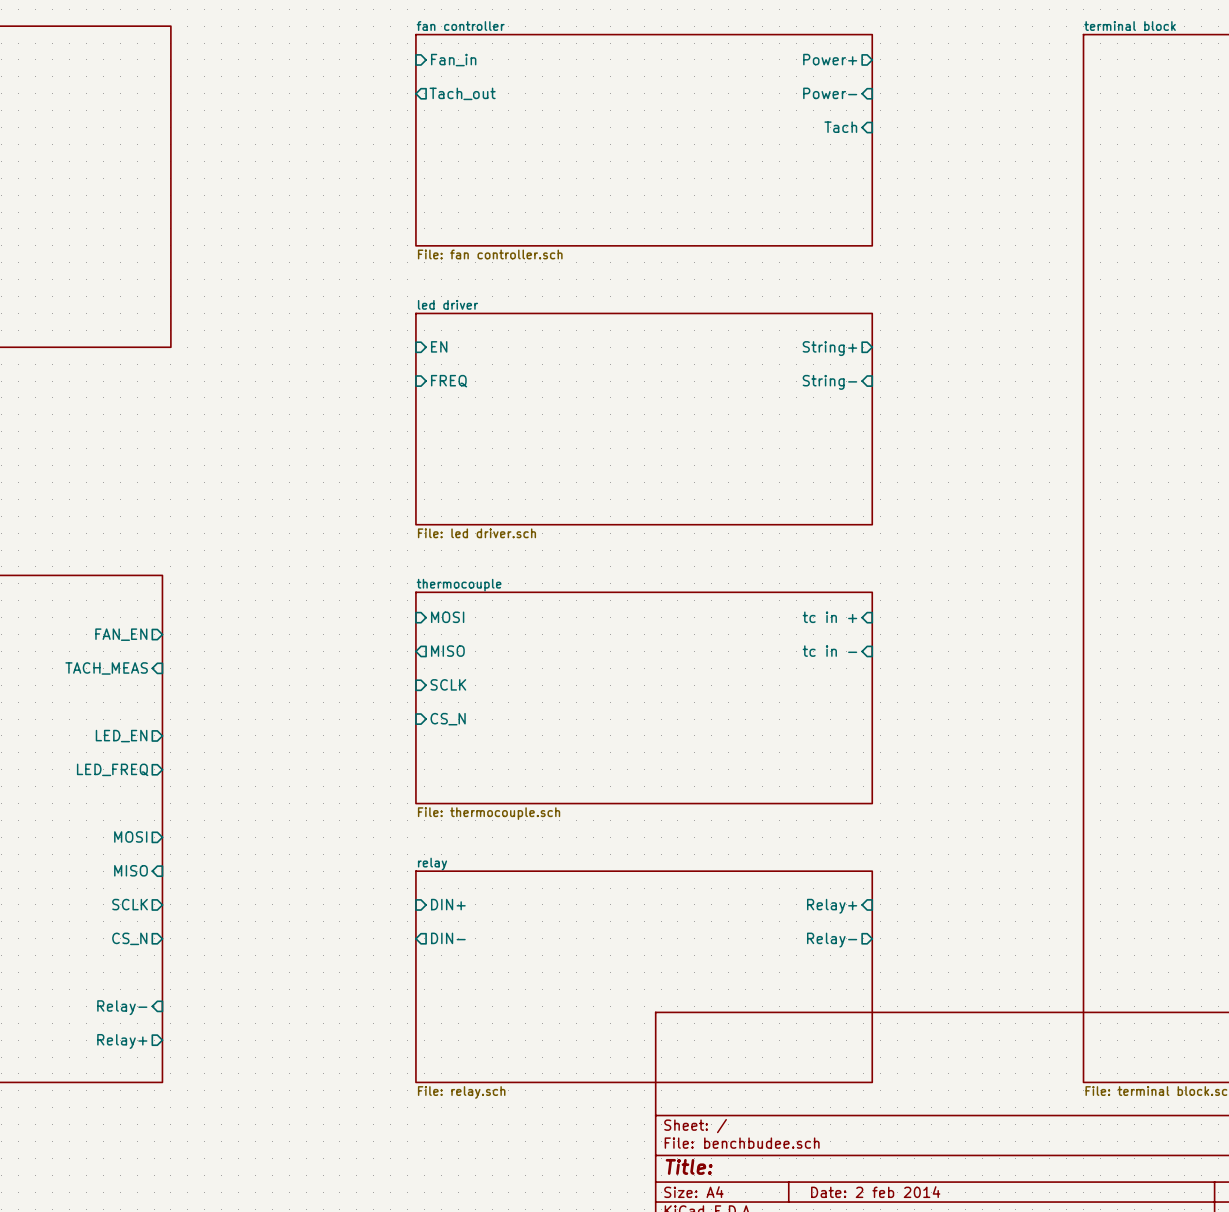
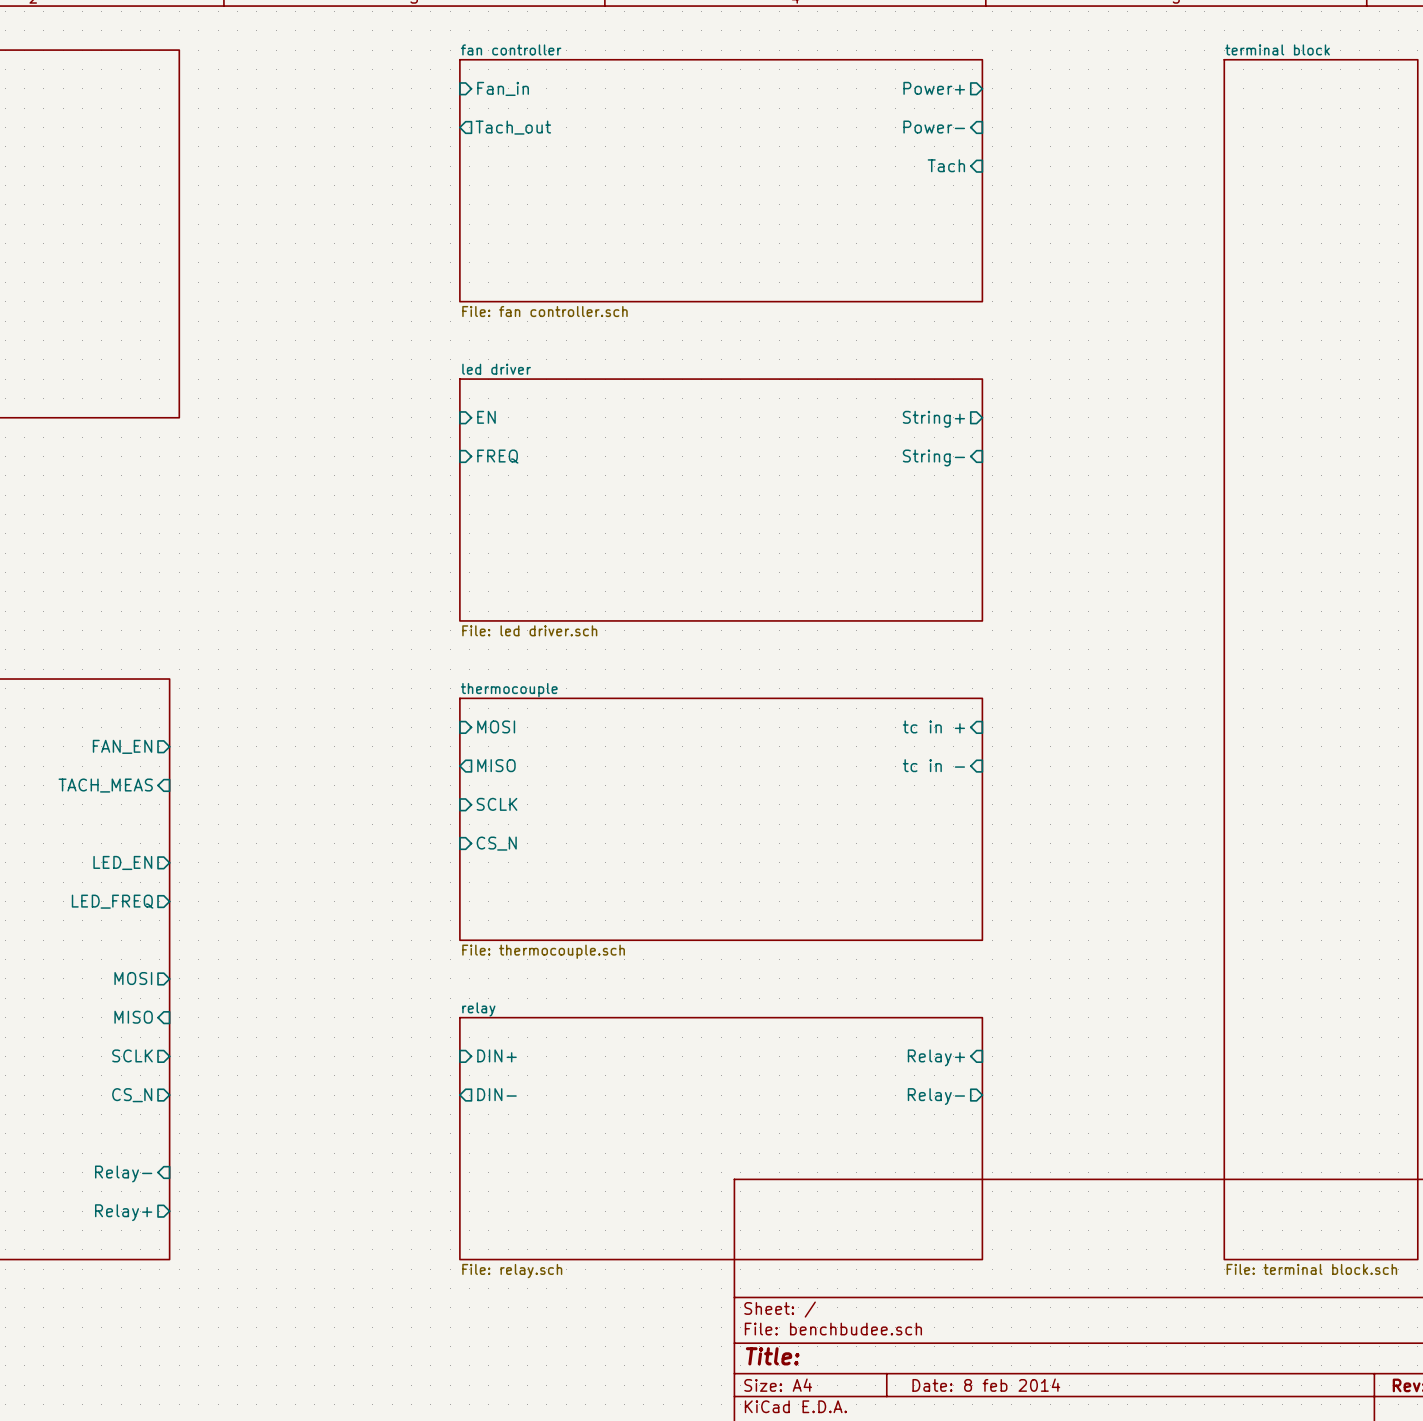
title block: Date: 2 feb 2014 (875, 1192) -> Date: 8 feb 2014 (986, 1385)

